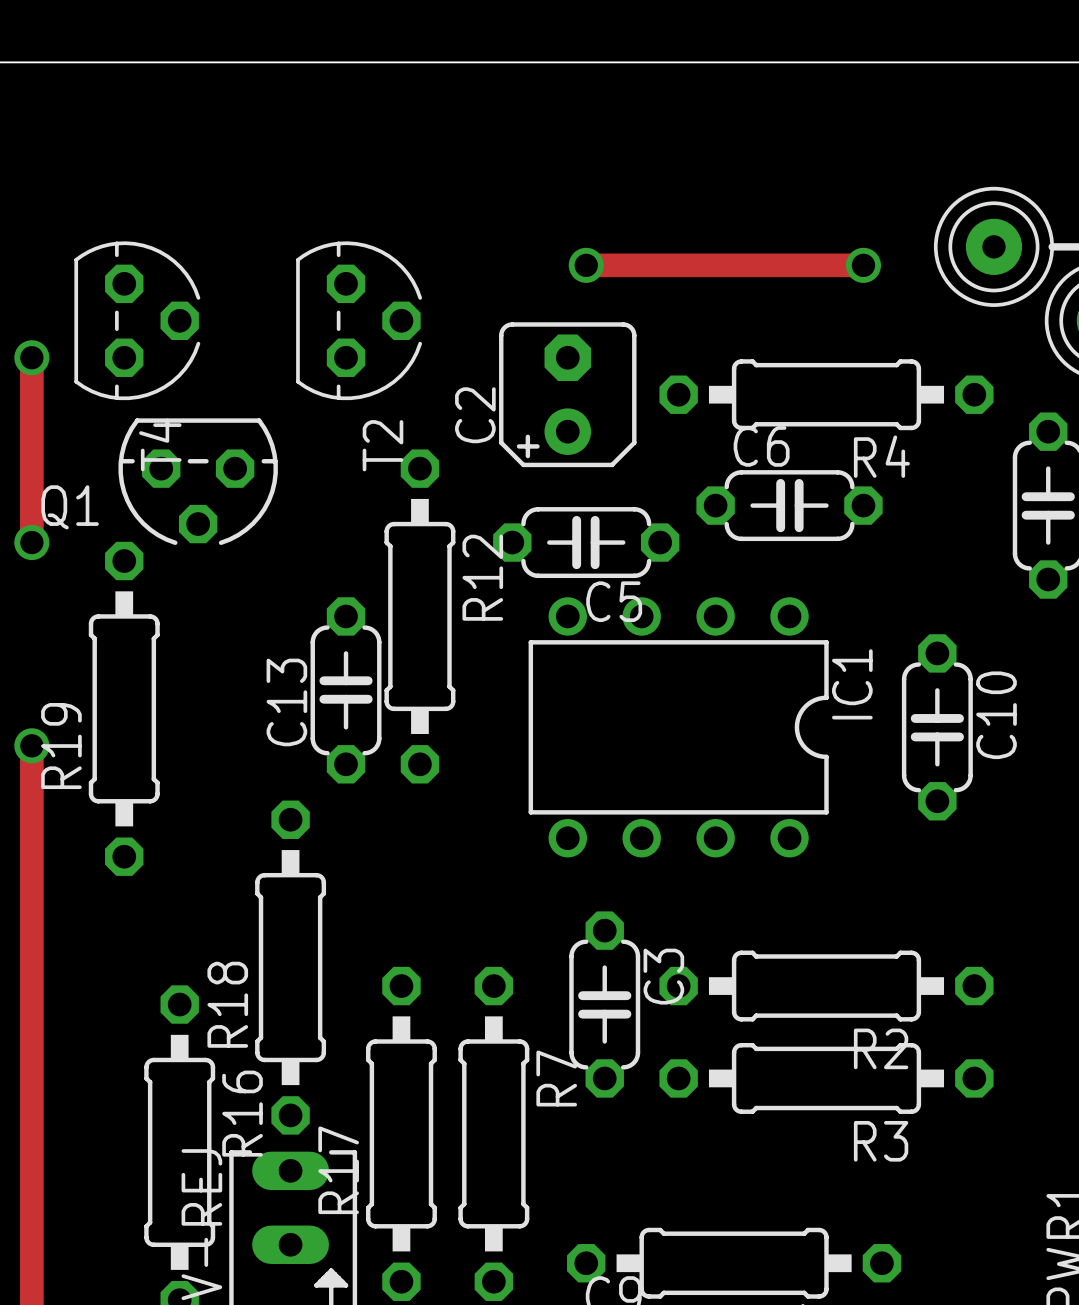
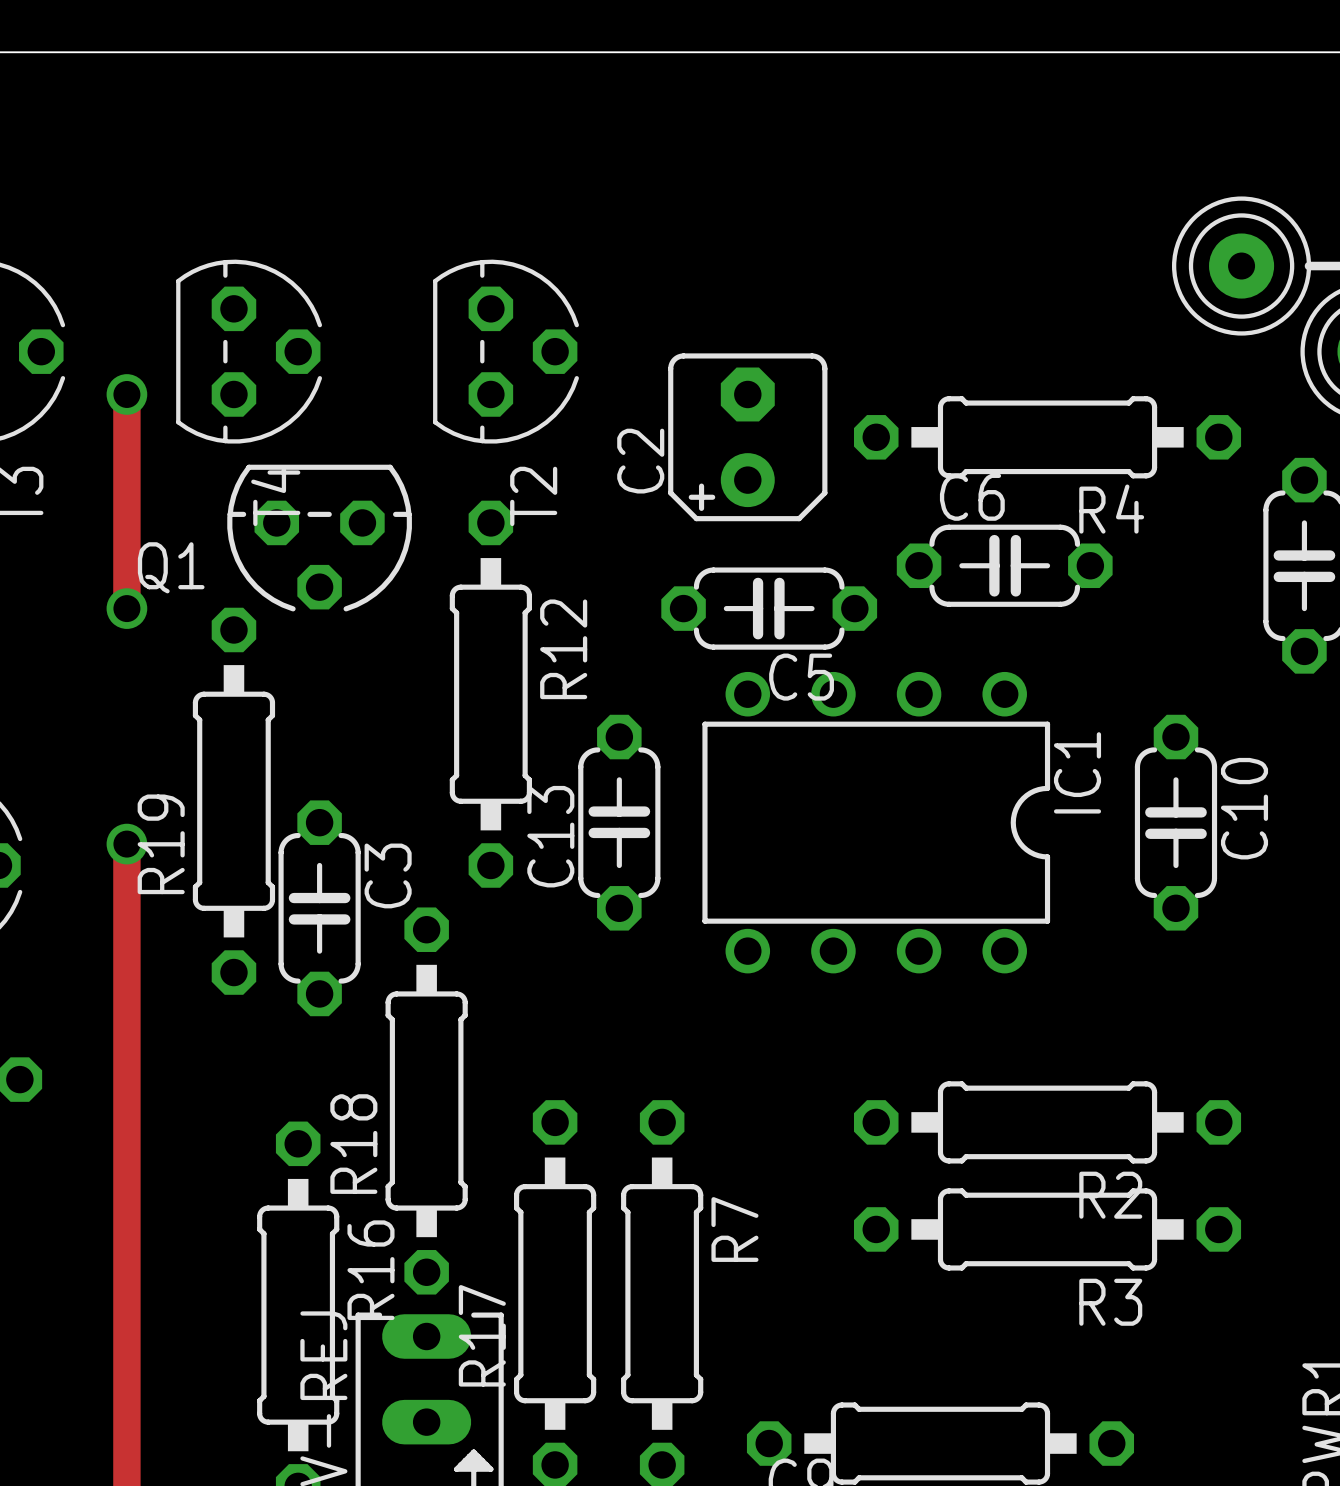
track: (586, 265) (863, 265) -> none
via: (586, 265) -> none
via: (863, 265) -> none
R12 position: (419, 616) -> (490, 694)
C13 position: (346, 690) -> (619, 822)
C3 position: (604, 1004) -> (319, 908)

